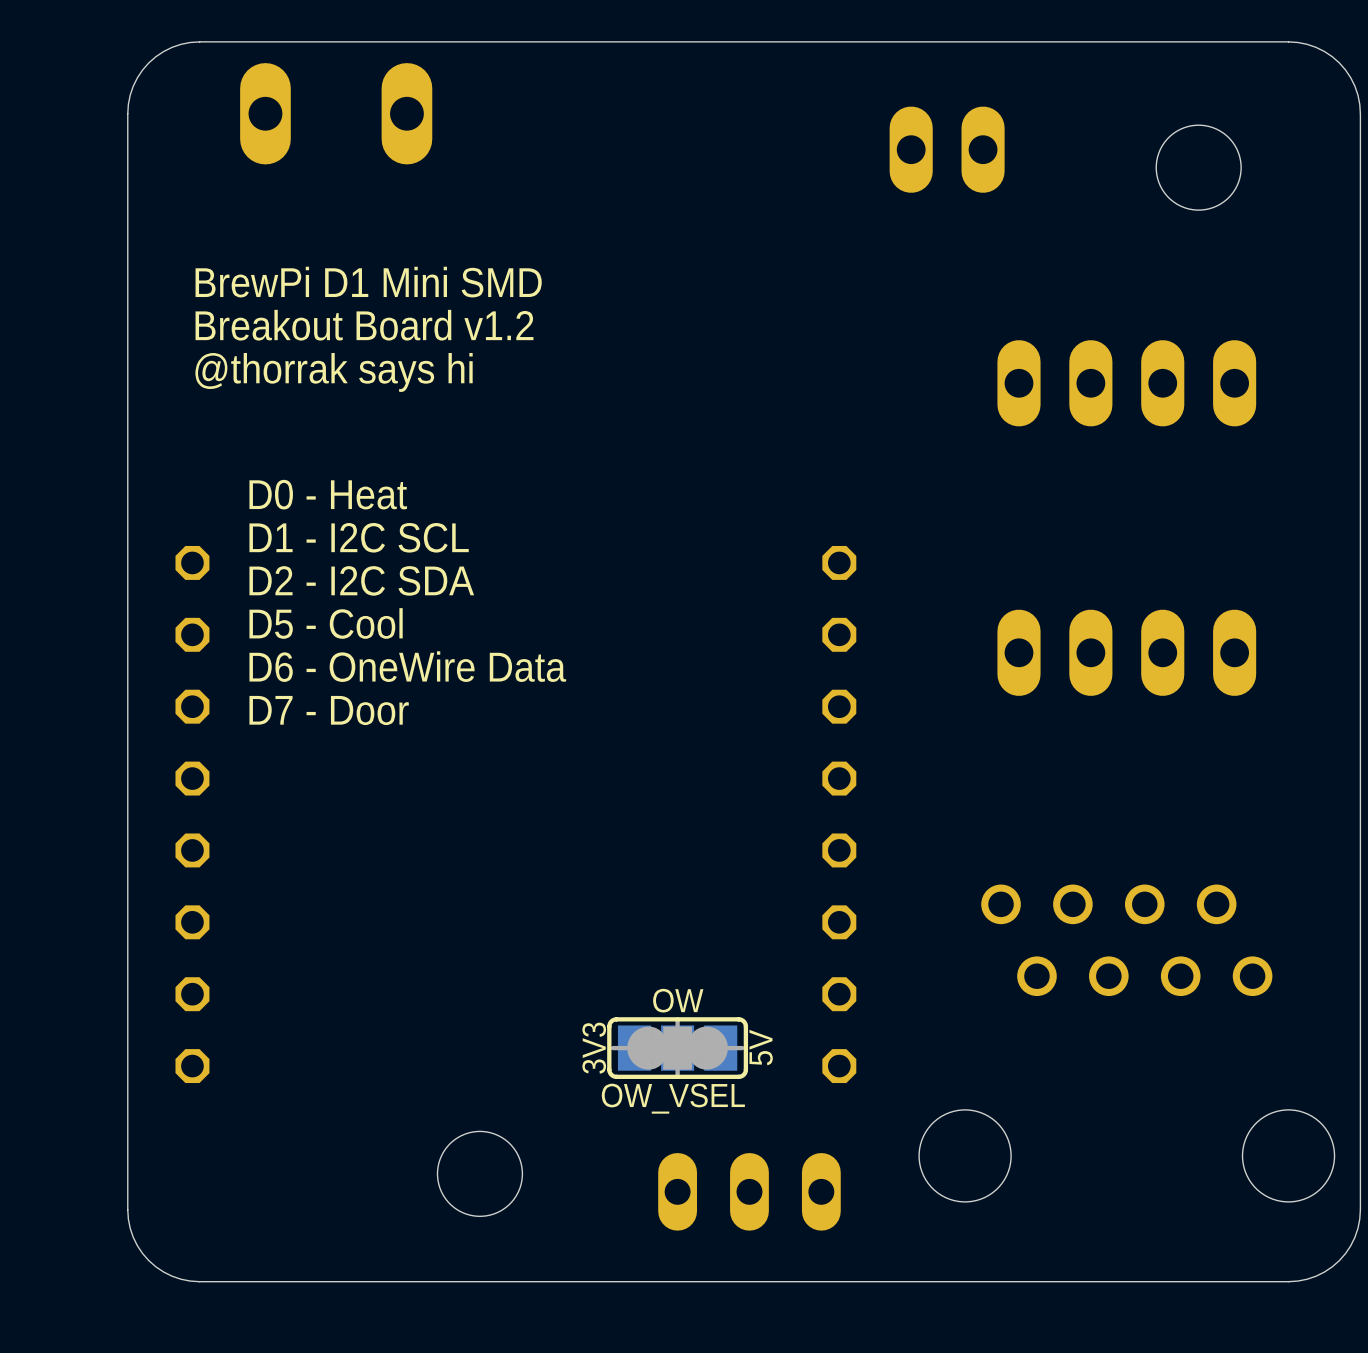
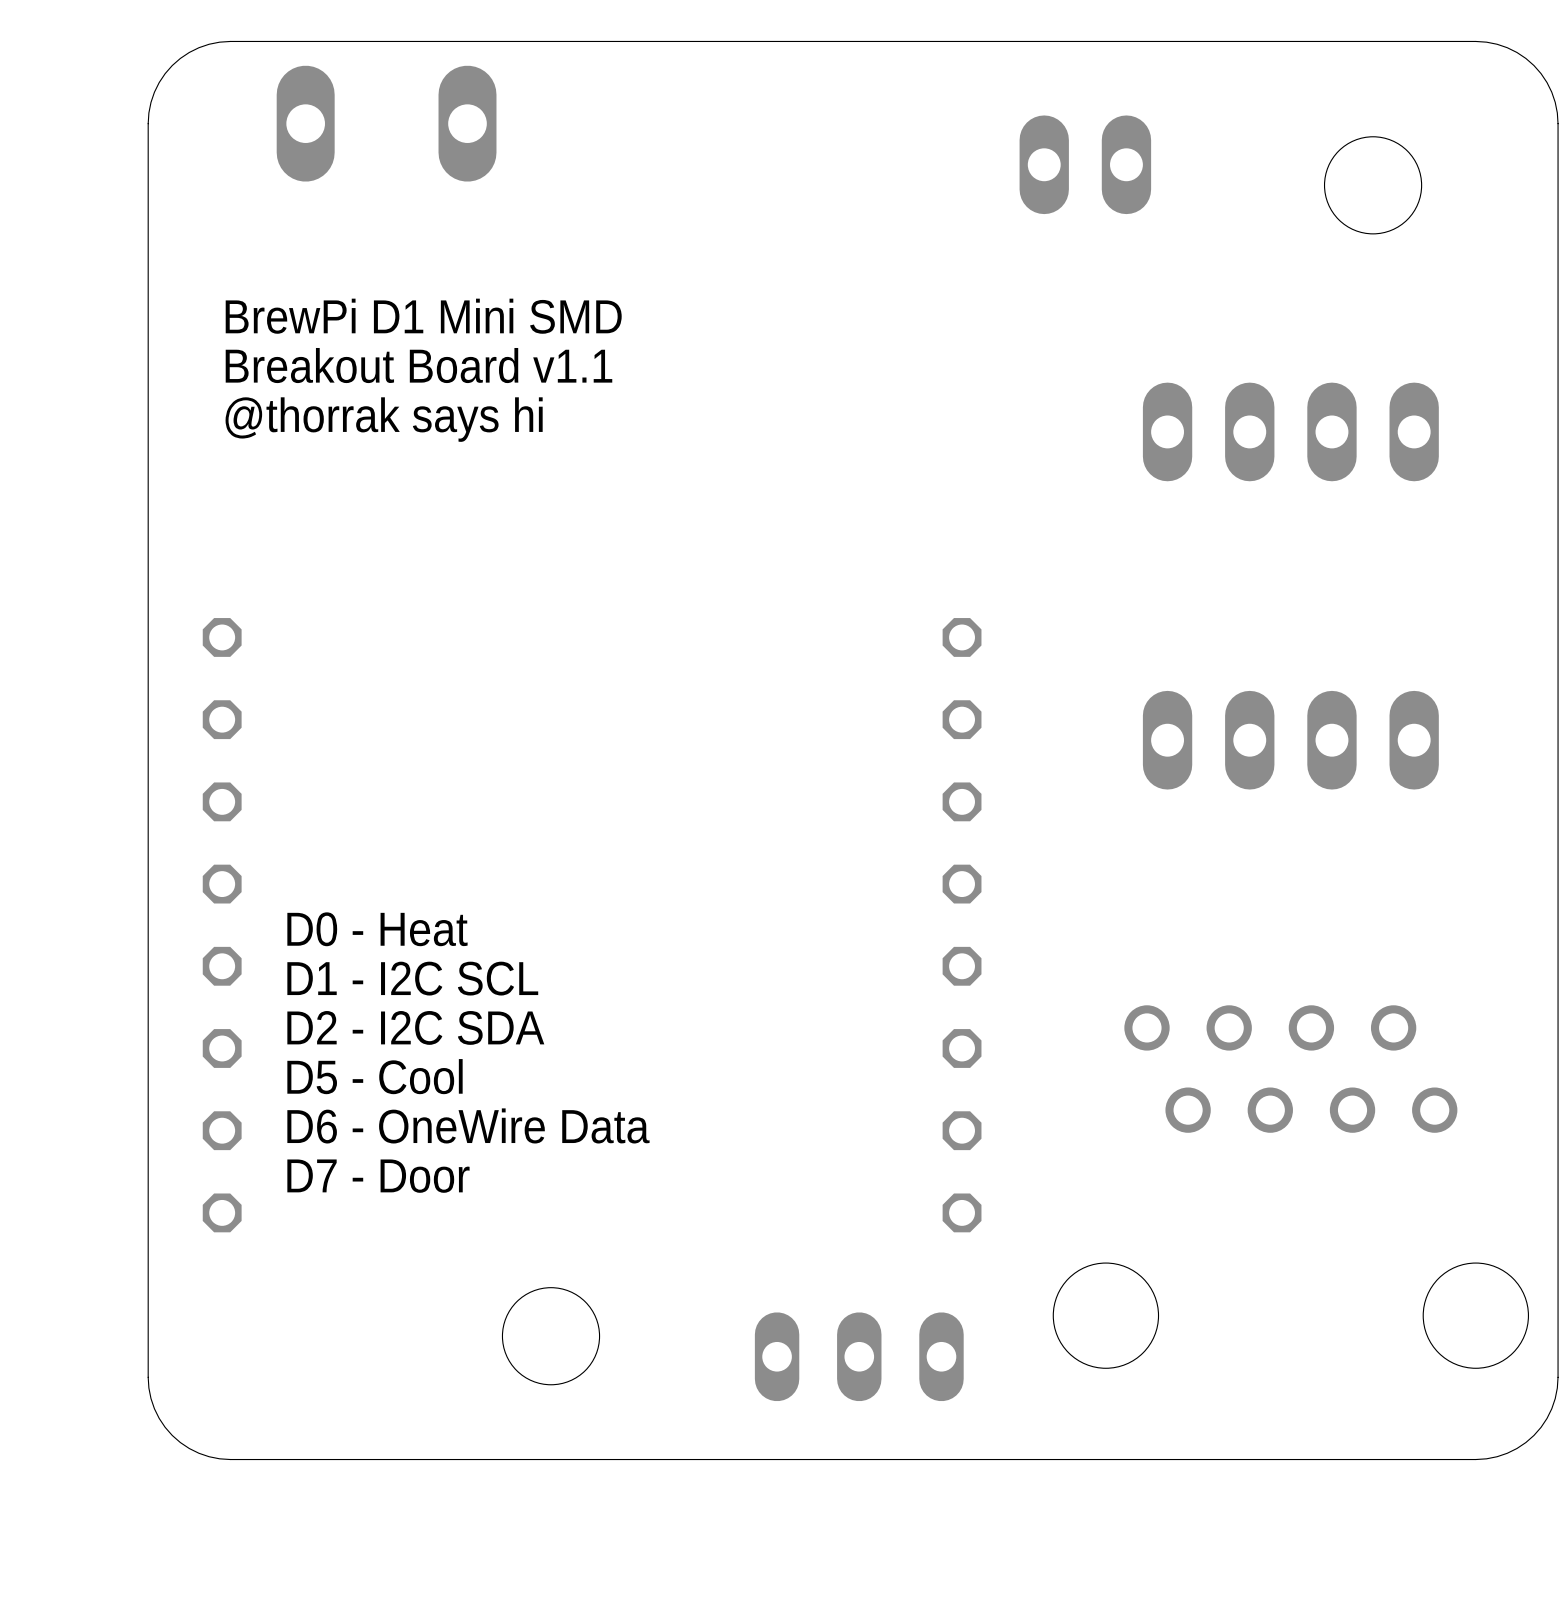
text: Breakout Board v1.2 (364, 325) -> Breakout Board v1.1 (418, 365)
text position: D0 - Heat (328, 494) -> D0 - Heat (377, 929)
text position: D1 - I2C SCL (359, 537) -> D1 - I2C SCL (412, 978)
text position: D2 - I2C SDA (361, 580) -> D2 - I2C SDA (415, 1027)
text position: D5 - Cool (326, 623) -> D5 - Cool (375, 1076)
text position: D6 - OneWire Data (407, 666) -> D6 - OneWire Data (468, 1125)
text position: D7 - Door (329, 710) -> D7 - Door (378, 1176)
text: OW (678, 1000) -> none
text: 5V (761, 1047) -> none
text: 3V3 (594, 1048) -> none
OW_VSEL: (677, 1048) -> none

